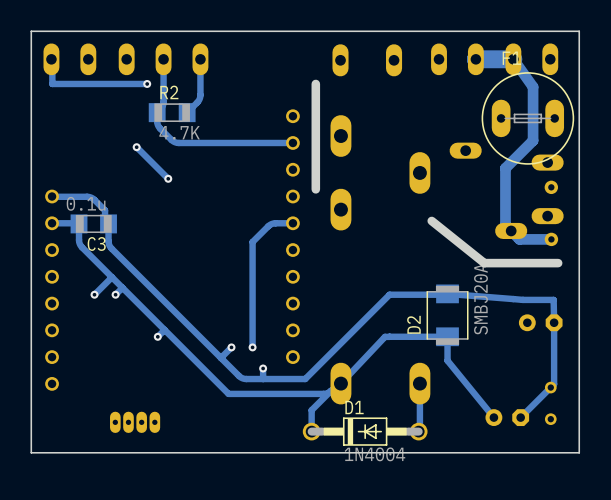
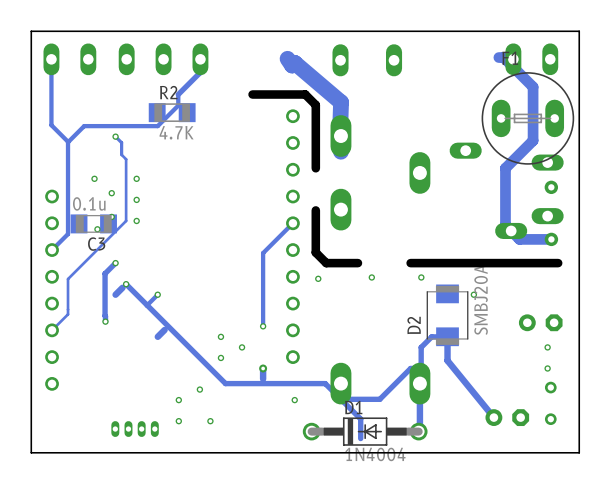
track: none -> (287, 58) (292, 65) (294, 62) (341, 102) (340, 151)
track: (51, 59) (52, 83) (147, 83) -> (51, 59) (51, 125) (68, 142)
track: (163, 59) (163, 103) (157, 112) (157, 122) (159, 127) (173, 141) (292, 142) -> none
part: (457, 59) -> none
track: (475, 59) (513, 59) (533, 87) -> (498, 57) (503, 57) (533, 87)
track: (200, 62) (200, 97) (187, 112) -> (200, 62) (199, 72) (178, 94) (178, 105) (157, 126) (84, 126) (68, 142) (68, 234) (52, 250)
via: (147, 83) -> none
board edge: (315, 83) (315, 105) -> (252, 94) (305, 94) (315, 105)
track: none -> (115, 136) (121, 142) (121, 154) (126, 159) (126, 220) (68, 279) (68, 314) (52, 330)
via: none -> (115, 136)
track: (136, 147) (168, 178) -> none
via: (136, 147) -> none
board edge: (315, 168) (315, 189) -> none
via: none -> (94, 178)
via: none -> (136, 178)
via: (168, 178) -> none
via: none -> (111, 193)
track: (52, 196) (88, 196) (94, 199) (105, 210) (110, 247) (243, 378) (305, 379) (389, 294) (447, 293) (523, 299) (553, 299) (554, 384) (520, 417) -> none
via: none -> (136, 199)
board edge: none -> (315, 210) (315, 252) (326, 263) (357, 263)
via: none -> (111, 216)
via: none -> (136, 220)
board edge: (431, 220) (484, 263) -> (410, 263) (484, 263)
track: (52, 223) (79, 223) (79, 241) (82, 247) (228, 393) (323, 393) (331, 390) -> none
track: (292, 223) (271, 224) (252, 242) (252, 347) -> (292, 223) (263, 253) (263, 326)
via: none -> (97, 229)
track: none -> (115, 263) (105, 273) (105, 321)
via: none -> (115, 263)
track: (111, 277) (94, 294) -> none
via: none -> (371, 277)
via: none -> (421, 277)
via: none -> (318, 278)
track: none -> (126, 284) (225, 383) (325, 383) (360, 419) (360, 438)
via: none -> (126, 284)
via: (94, 294) -> none
via: (115, 294) -> none
via: none -> (157, 294)
via: none -> (473, 294)
via: none -> (105, 321)
via: none -> (263, 326)
via: (157, 336) -> none
via: none -> (220, 336)
track: (389, 336) (385, 336) (340, 383) (331, 390) -> none
track: (447, 336) (389, 336) -> (447, 336) (431, 336) (421, 347) (421, 368) (410, 368) (379, 399) (340, 399)
track: (231, 347) (220, 357) -> (157, 294) (147, 305)
via: (231, 347) -> none
via: none -> (242, 347)
via: (252, 347) -> none
via: none -> (547, 347)
via: none -> (220, 357)
via: none -> (547, 368)
via: none -> (199, 389)
track: (331, 390) (311, 410) (311, 431) -> none
via: none -> (178, 400)
via: none -> (294, 400)
part footprint: [110, 411, 161, 433] -> [111, 421, 159, 437]
via: none -> (178, 421)
via: none -> (210, 421)

